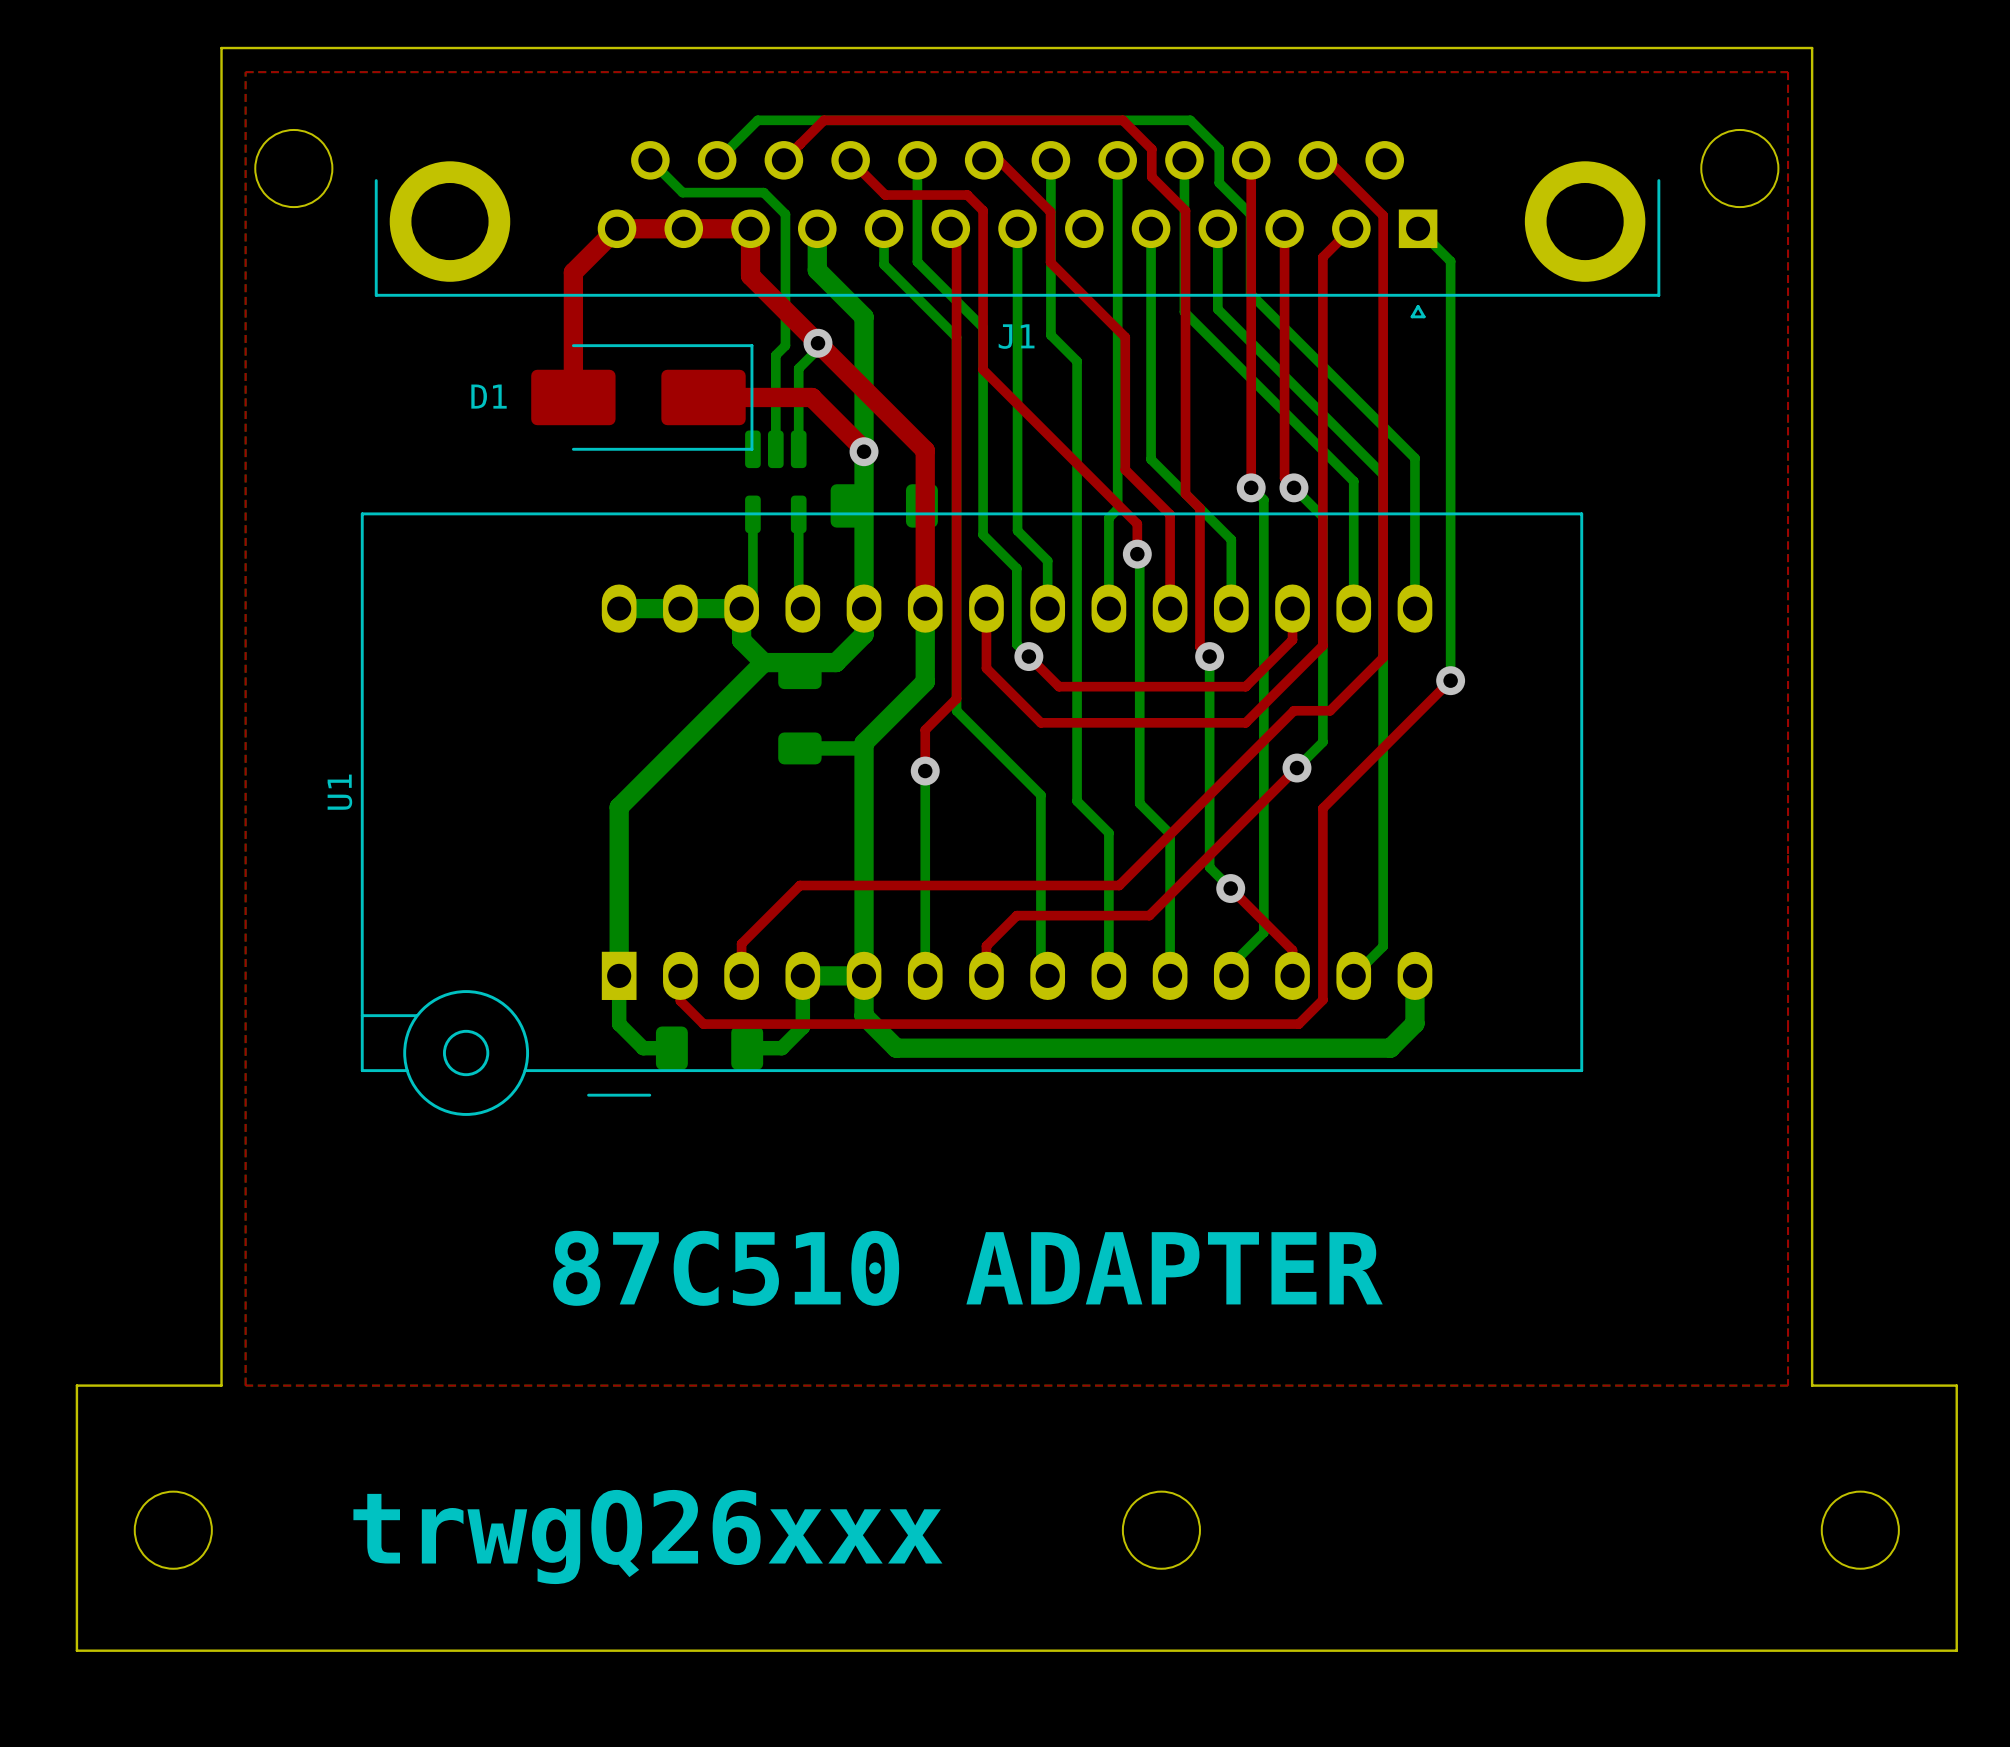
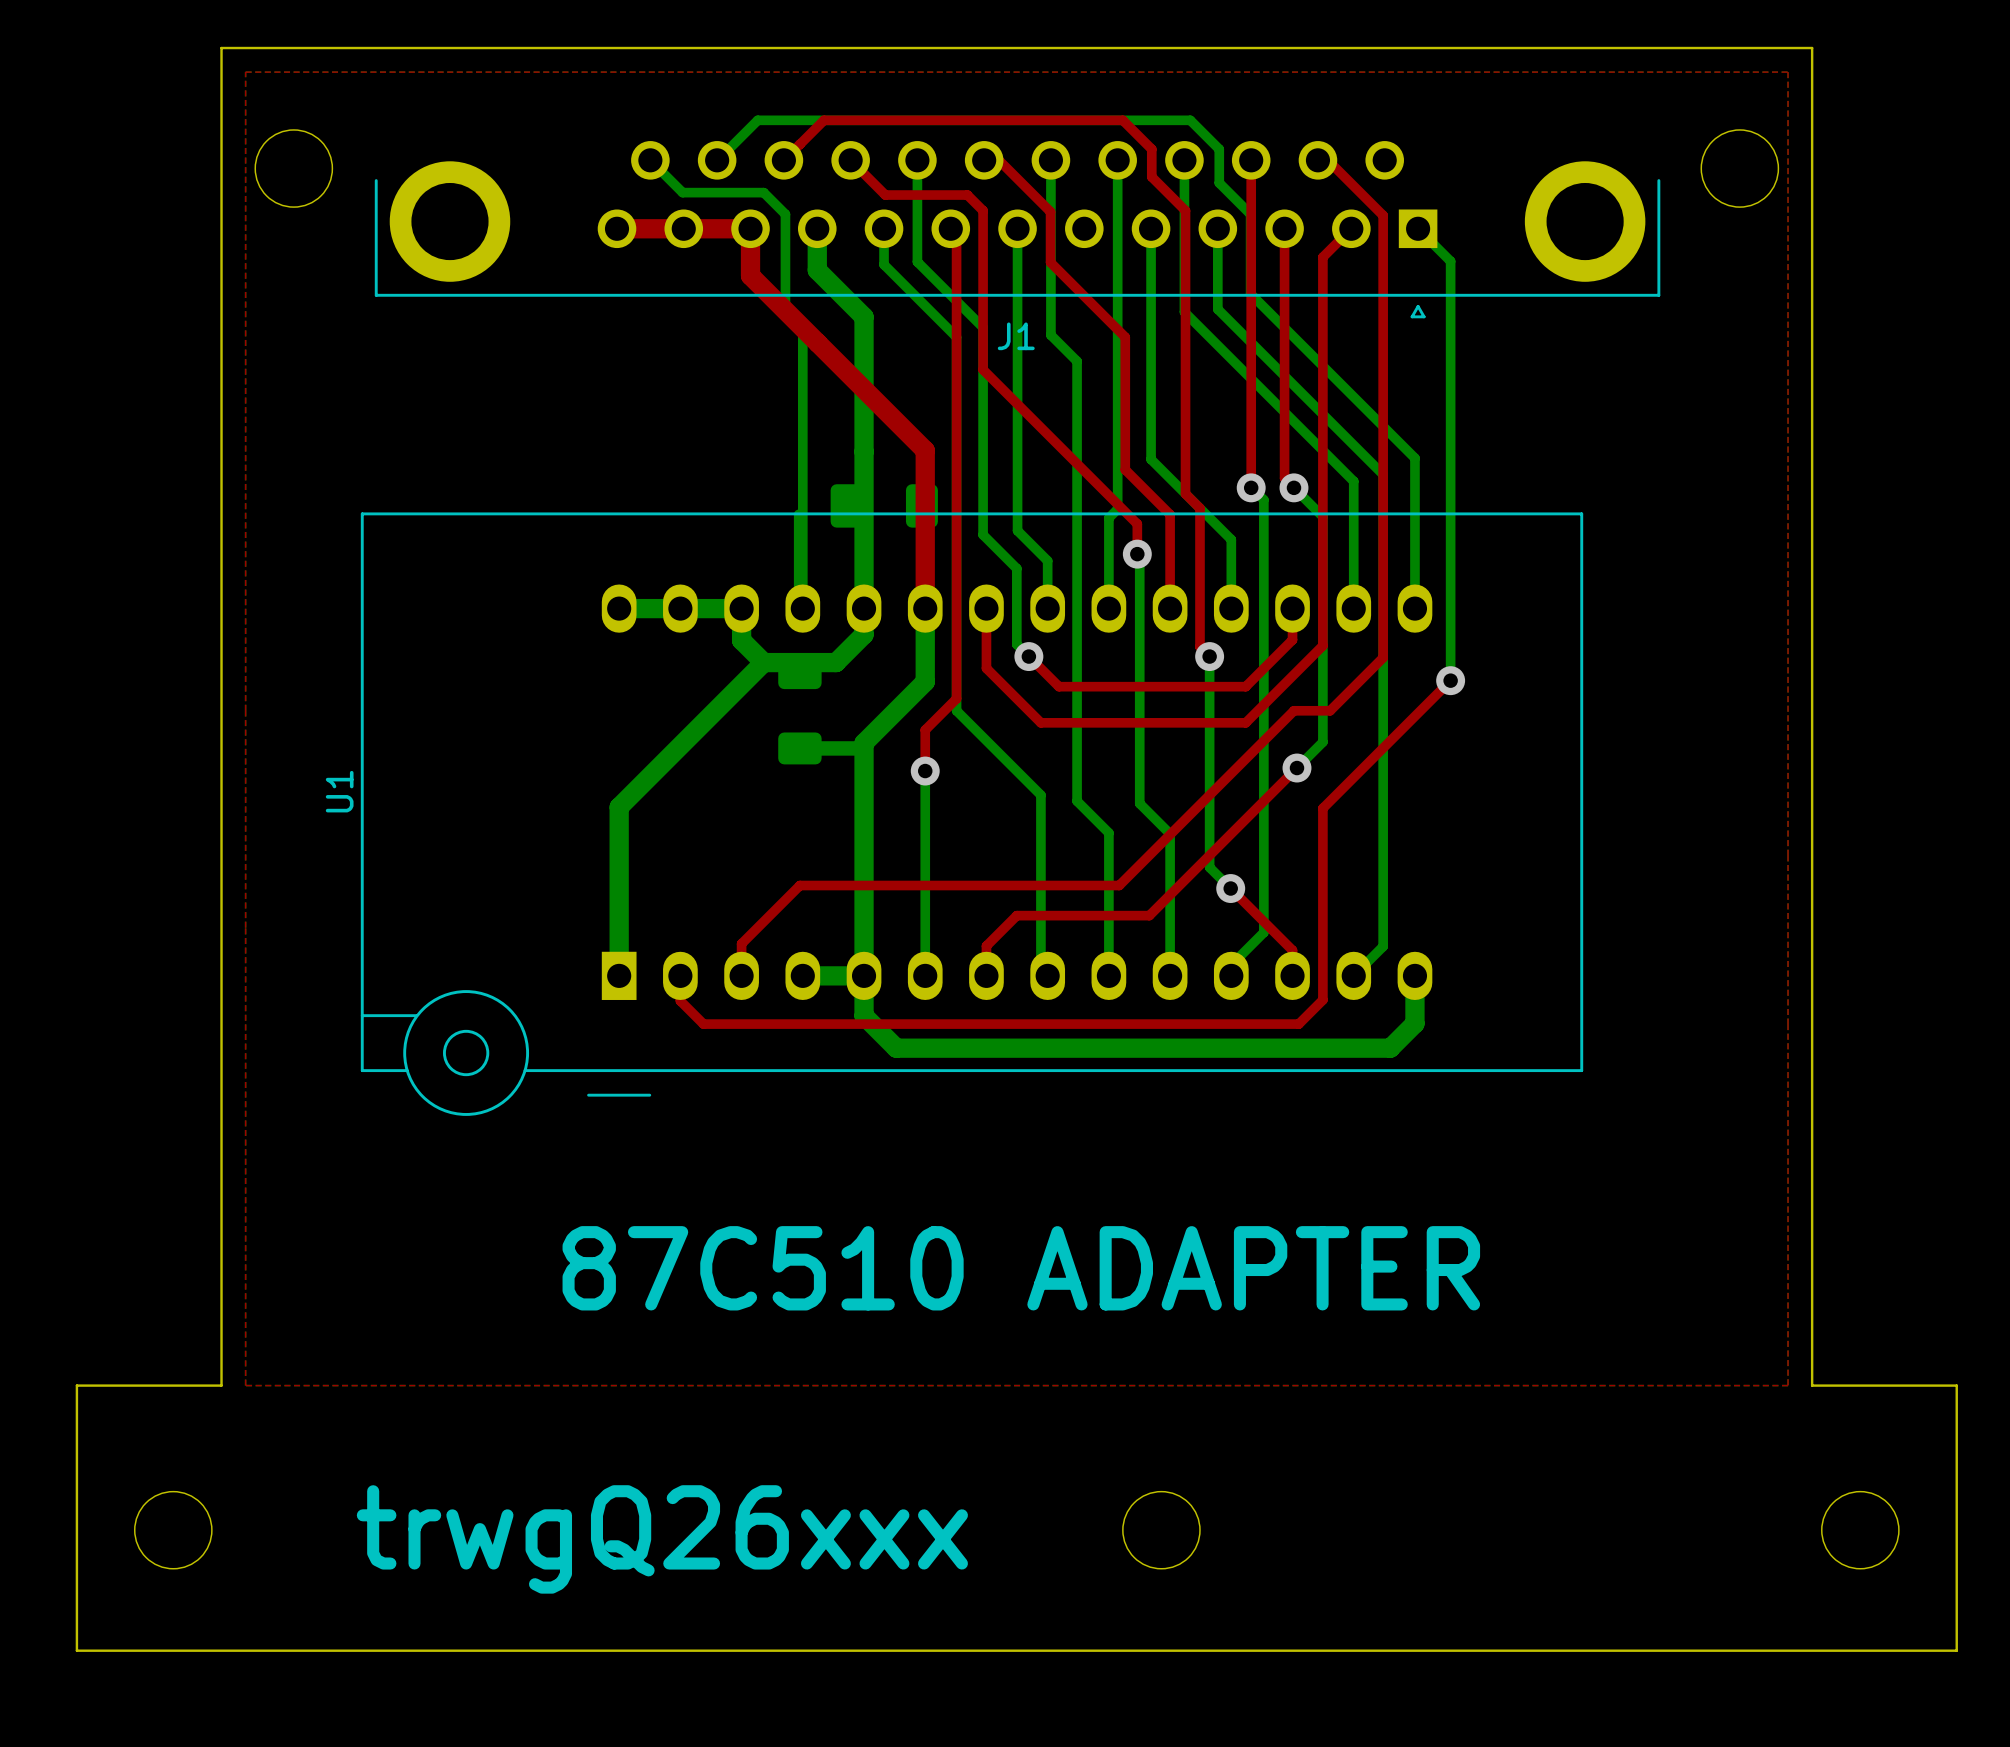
top track: (617, 228) (573, 272) (573, 397) -> none
bottom track: (785, 310) (785, 345) (775, 355) (775, 449) -> (785, 310) (802, 327) (802, 608)
bottom track: (818, 343) (818, 349) (798, 368) (798, 449) -> none
via: (818, 343) -> none
D1: (642, 397) -> none
top track: (703, 397) (811, 397) (864, 451) -> none
via: (864, 451) -> none
part: (775, 481) -> none
bottom track: (752, 514) (752, 597) (741, 608) -> none
bottom track: (619, 975) (619, 1024) (643, 1048) (671, 1048) -> none
bottom track: (802, 975) (802, 1027) (781, 1048) (747, 1048) -> none
part: (709, 1048) -> none

